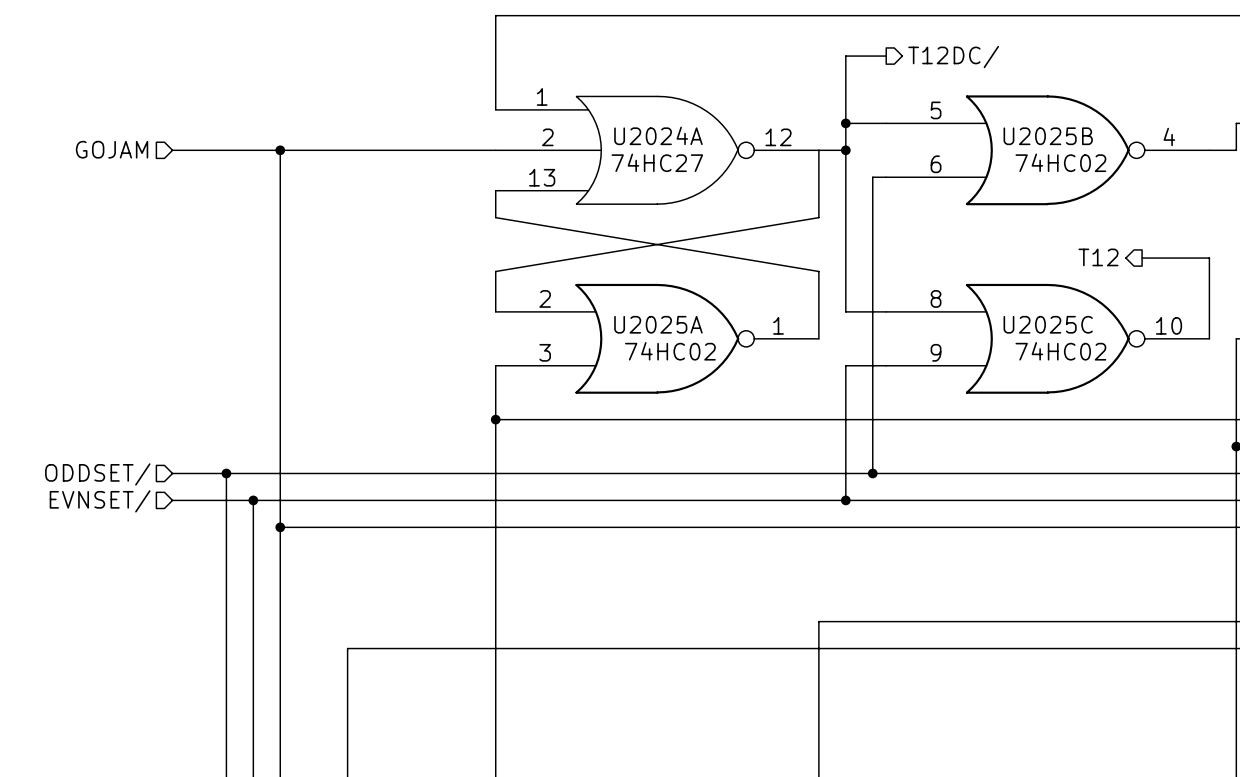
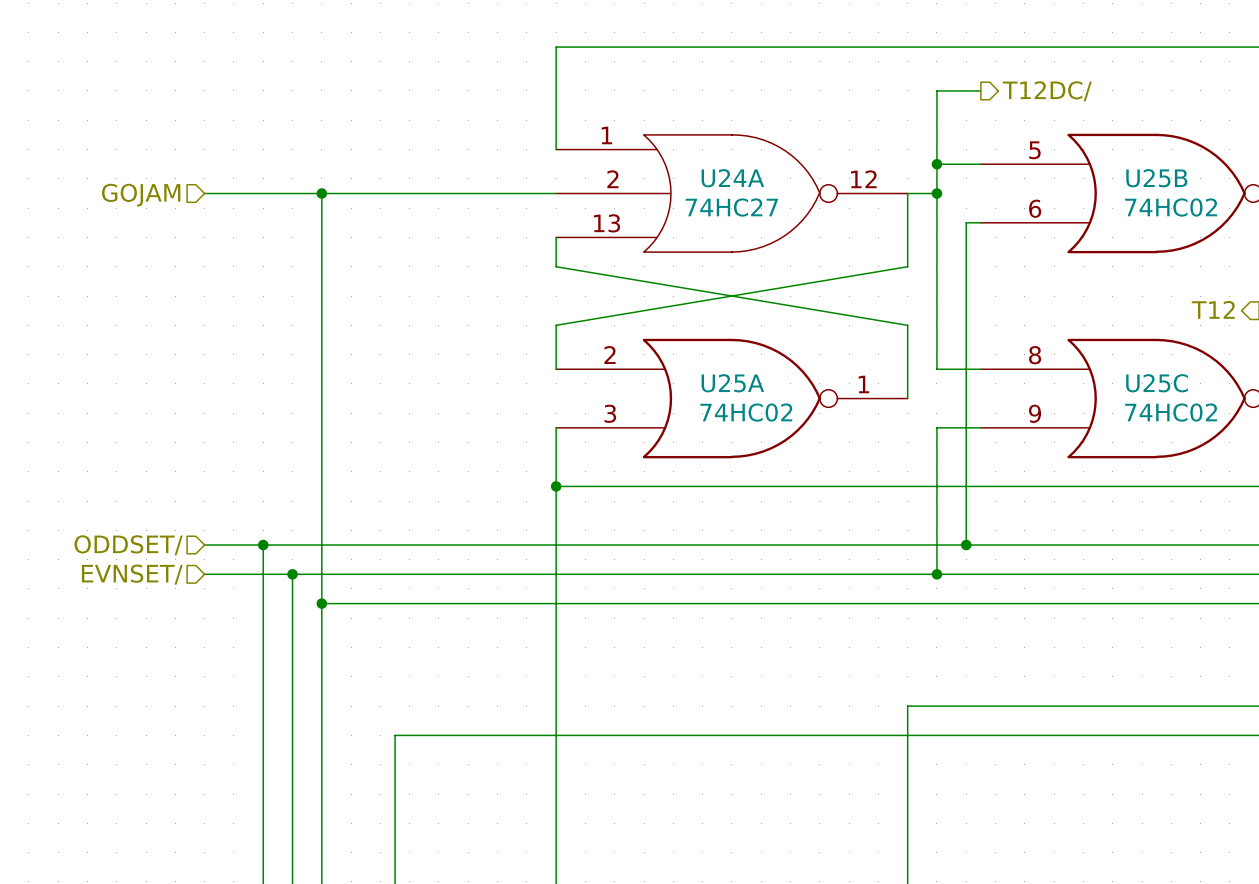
U2024A name: U2024A (658, 135) -> U24A (732, 178)
U2025B name: U2025B (1048, 136) -> U25B (1156, 178)
U2025A name: U2025A (658, 324) -> U25A (732, 383)
U2025C name: U2025C (1048, 324) -> U25C (1157, 383)

